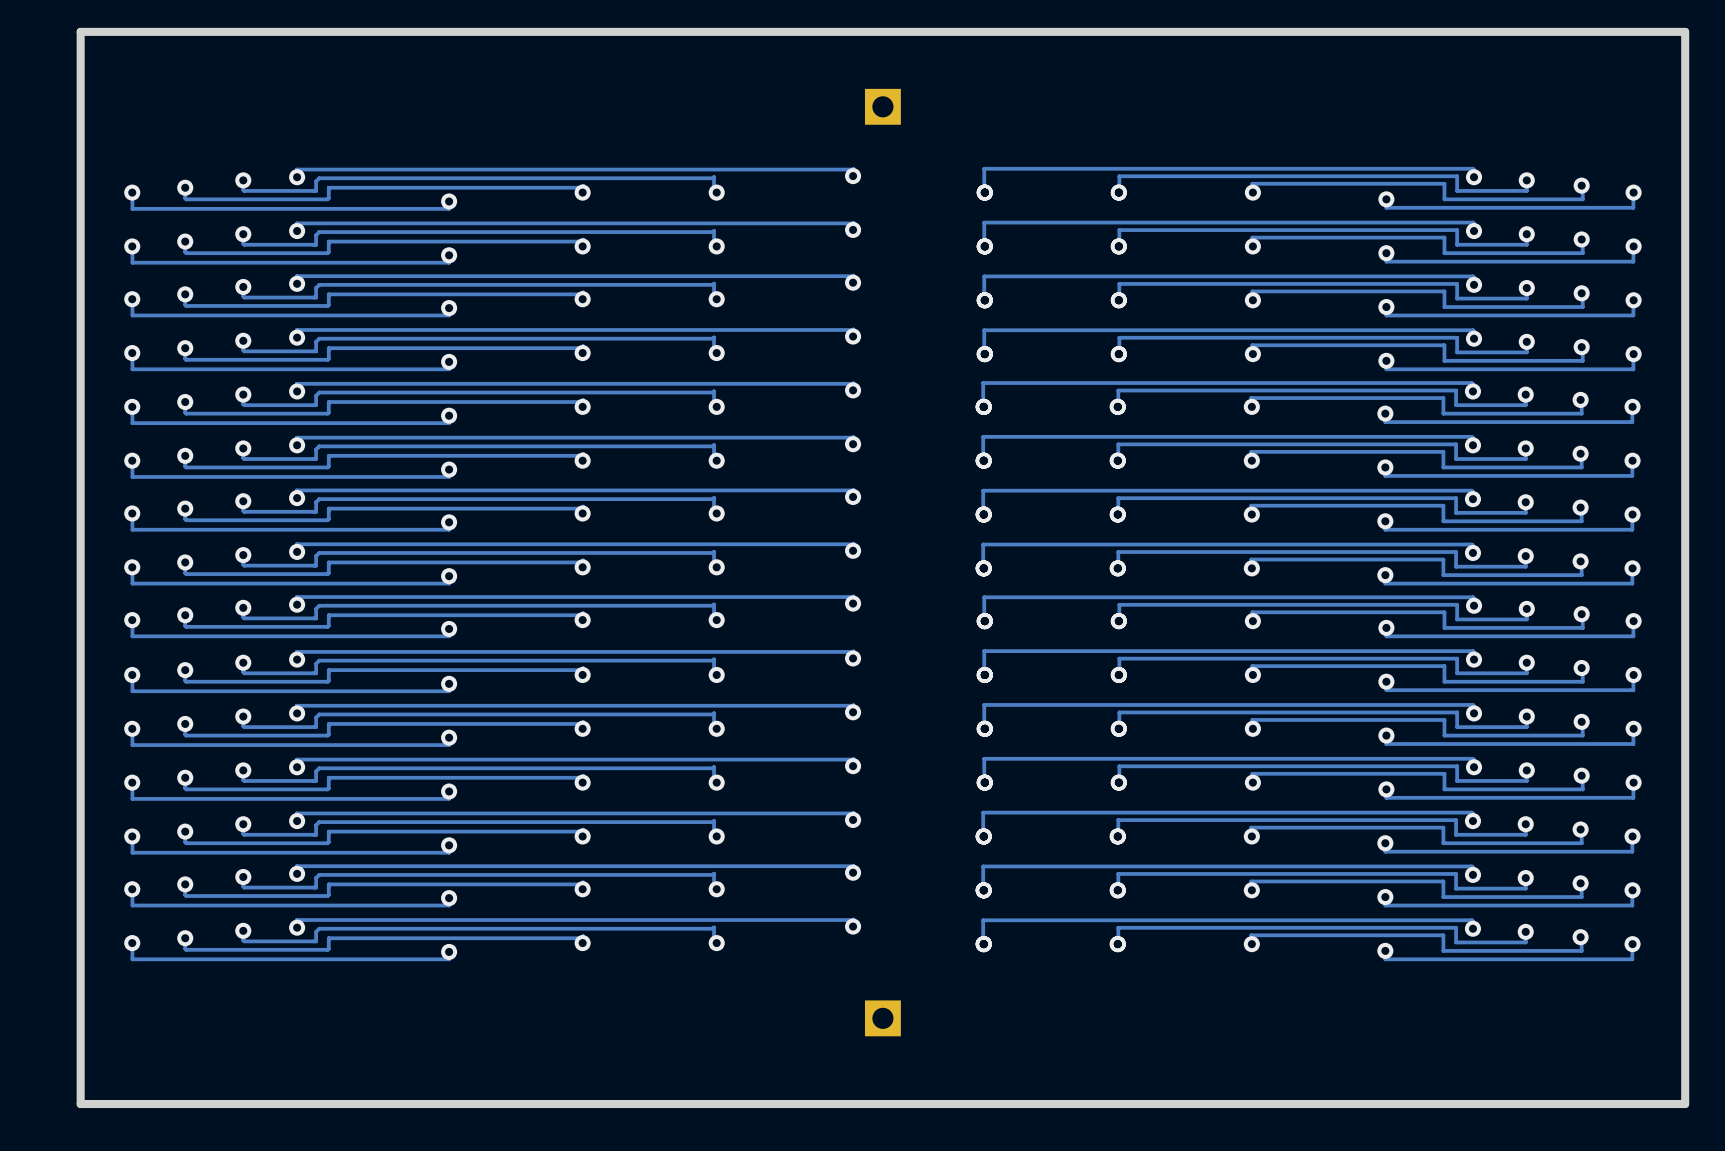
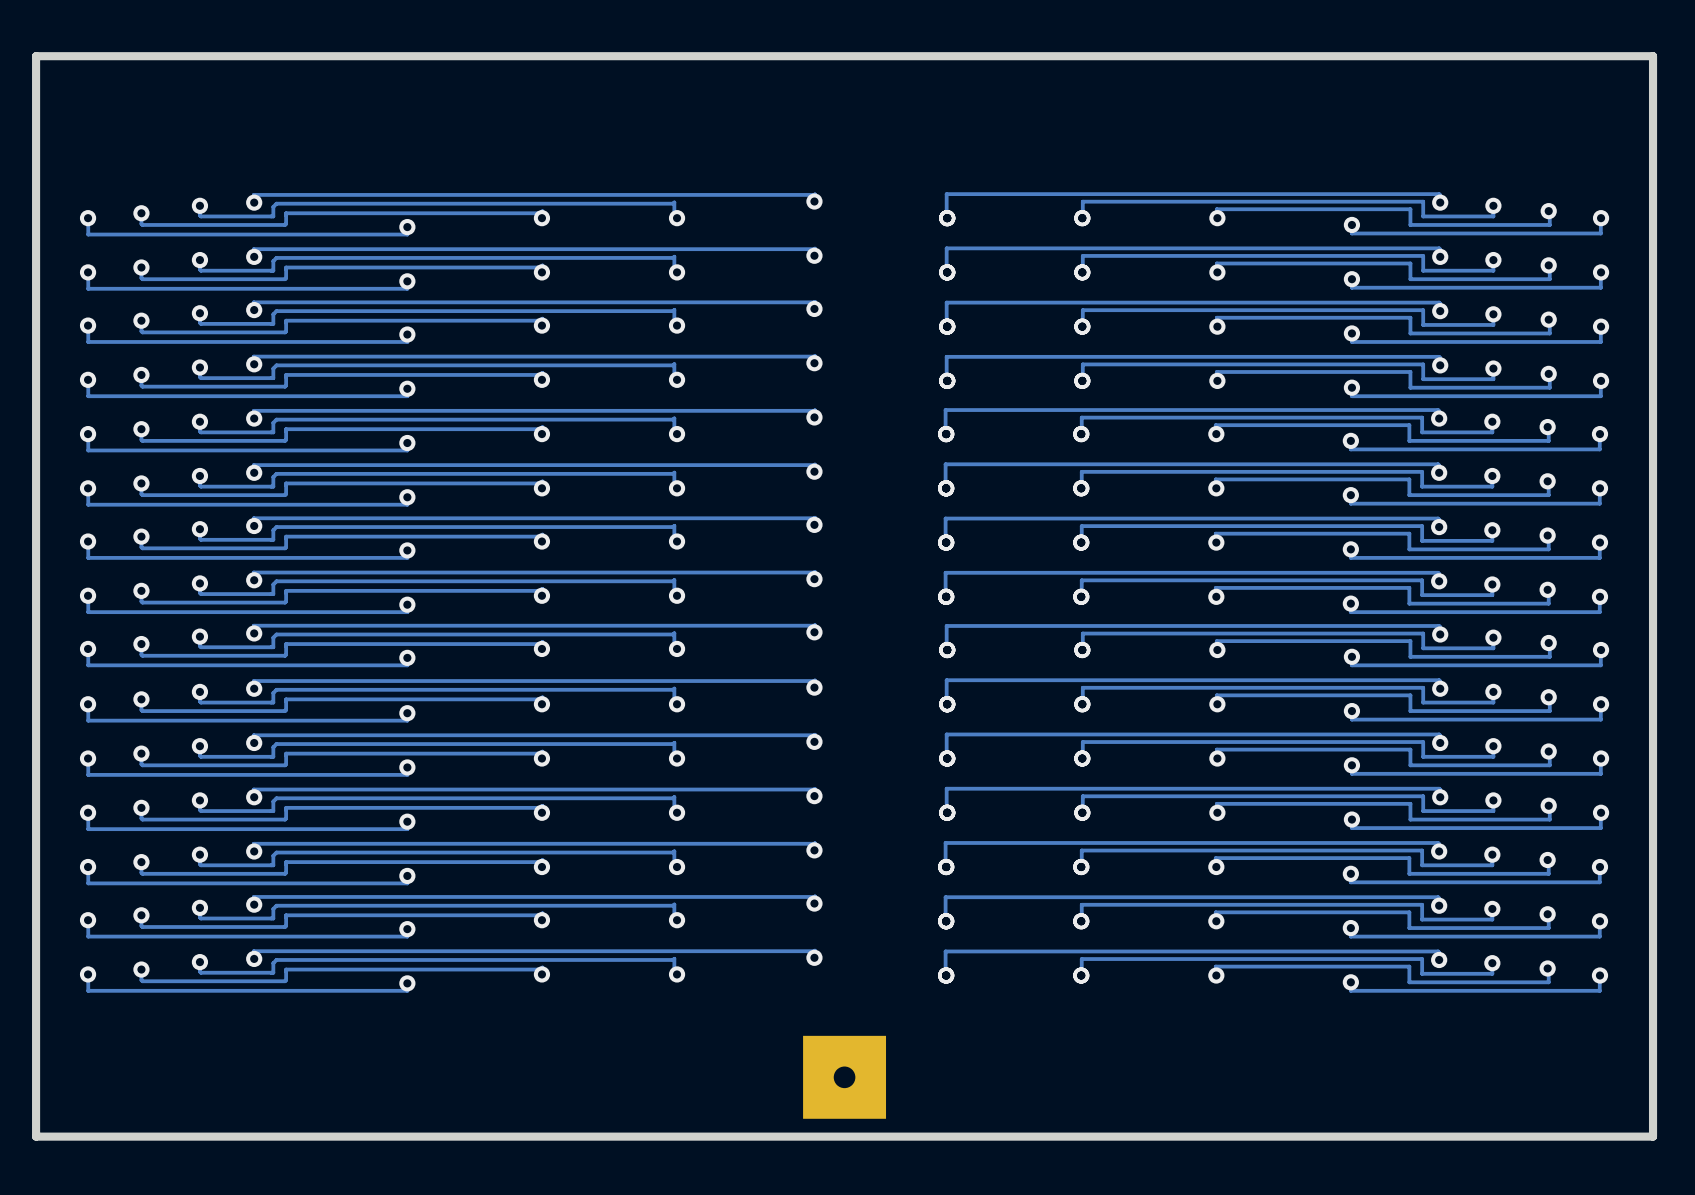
part: (882, 106) -> none
part: (882, 1018) -> none
part: none -> (844, 1077)

